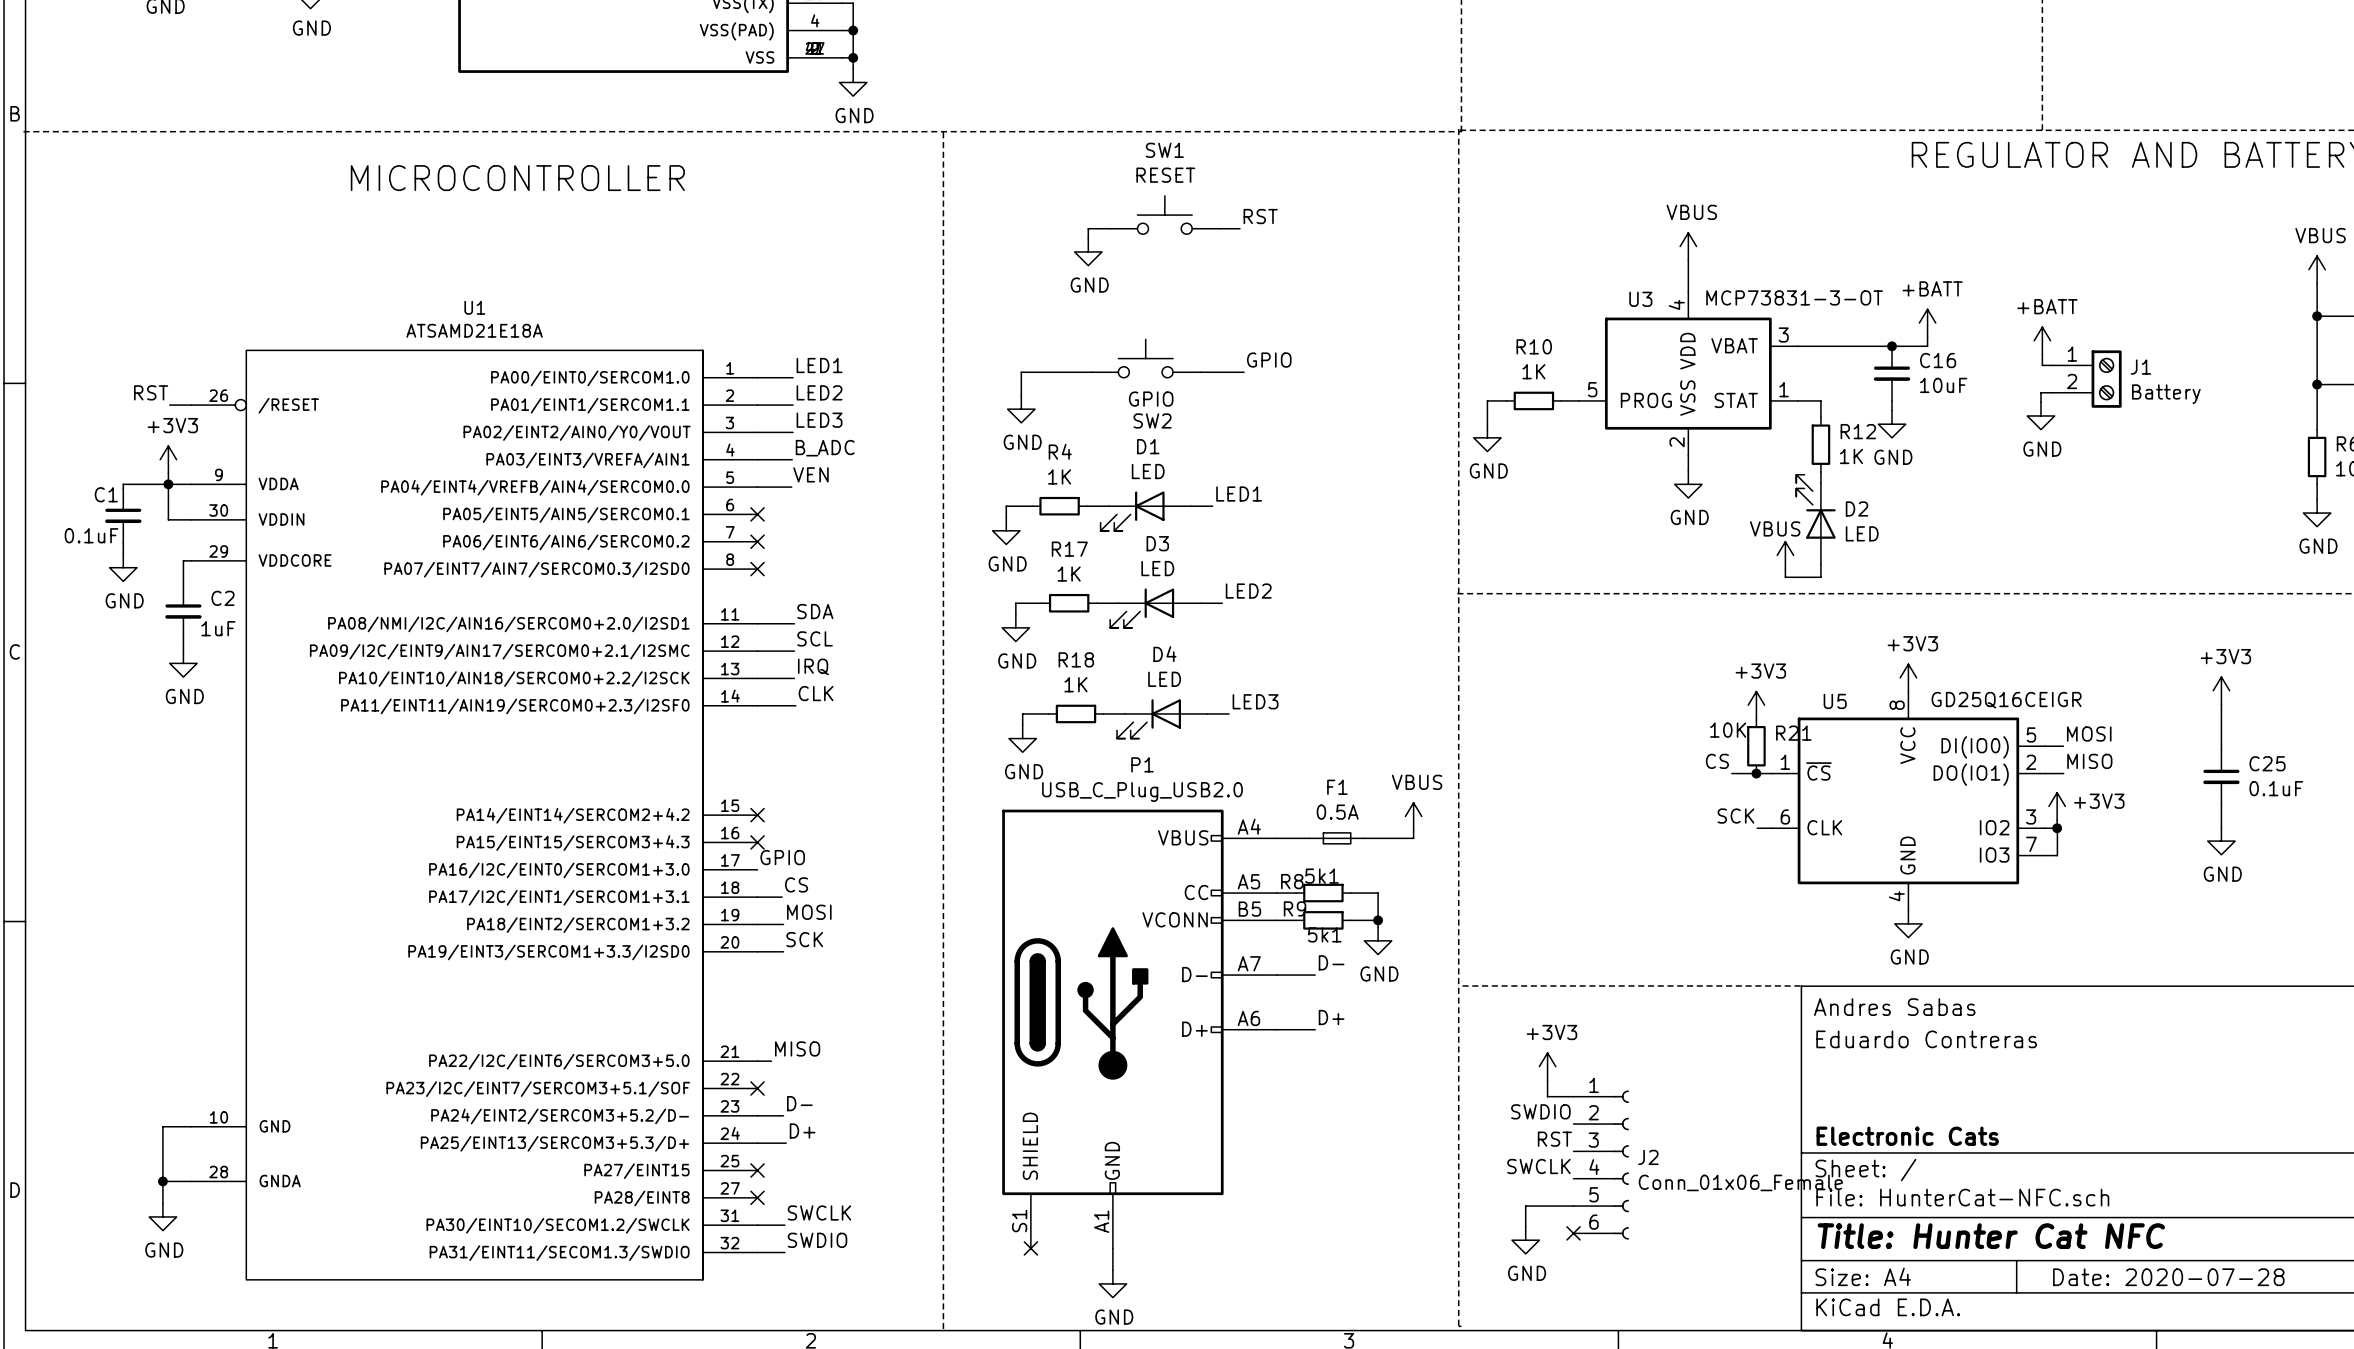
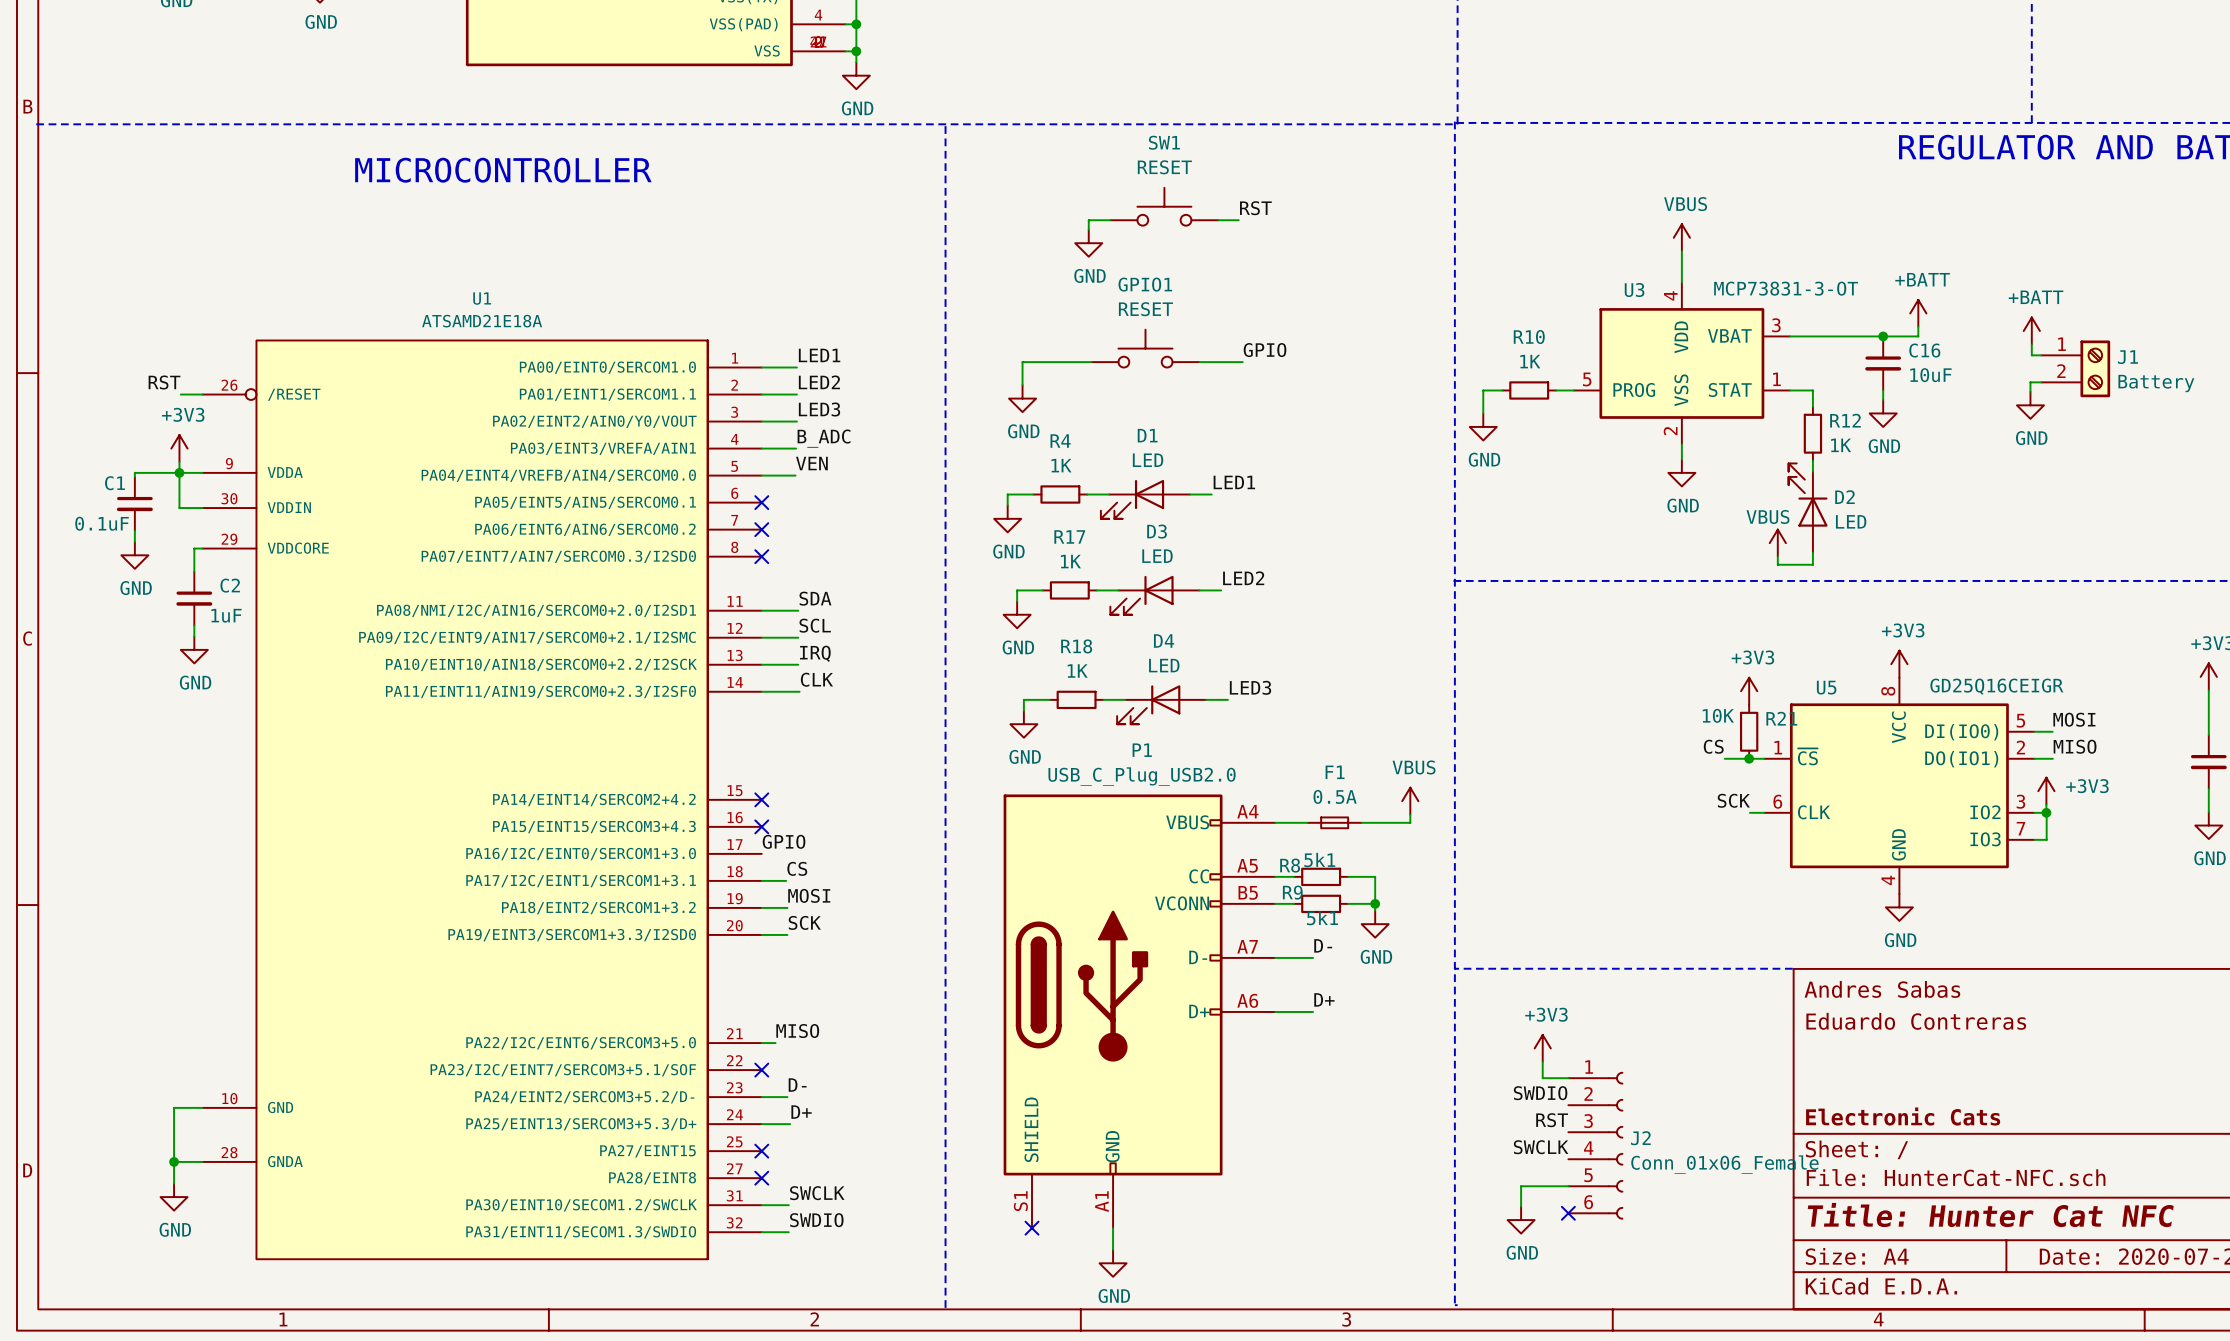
SW2 value: GPIO (1151, 399) -> RESET (1145, 309)
SW2 name: SW2 (1152, 420) -> GPIO1 (1145, 284)

